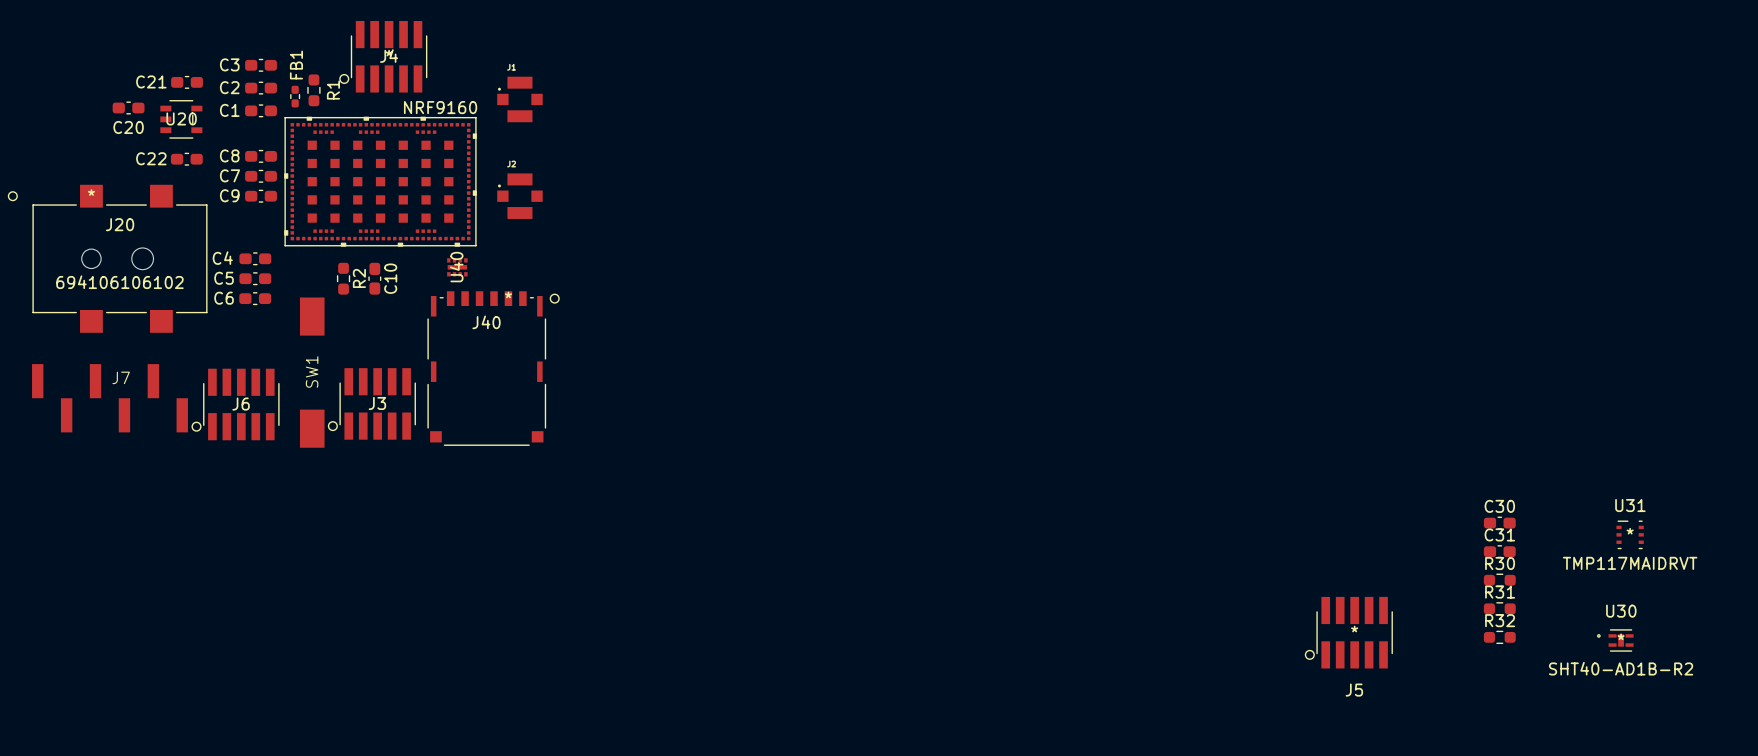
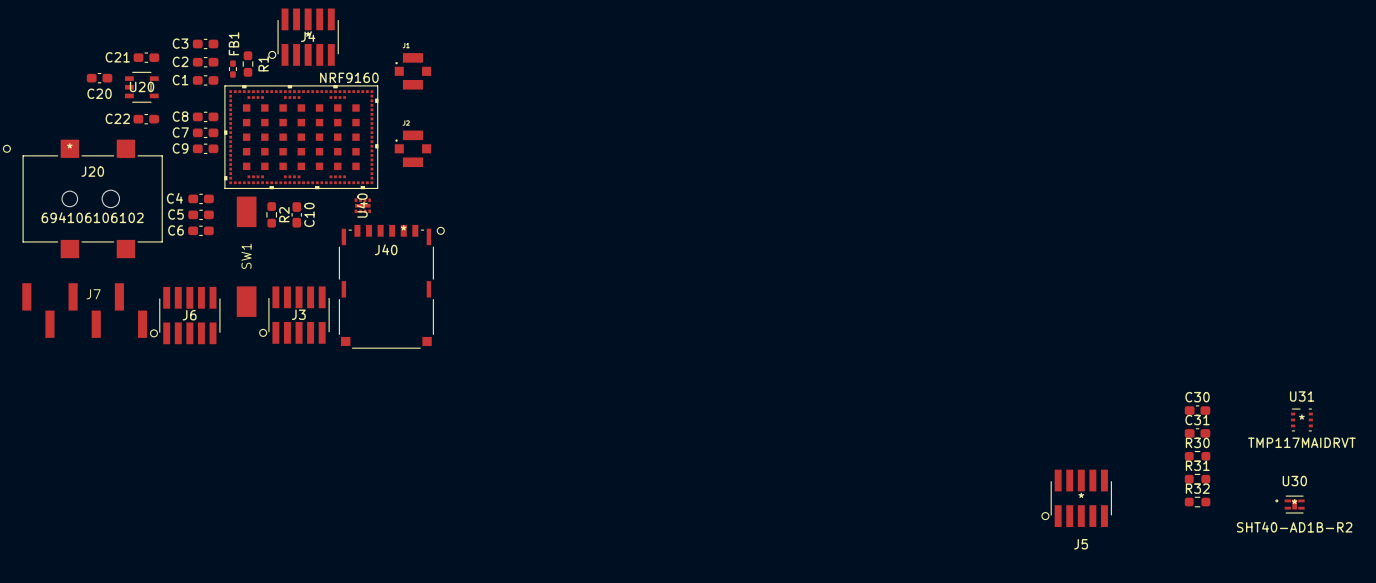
SW1 position: (312, 372) -> (246, 256)

